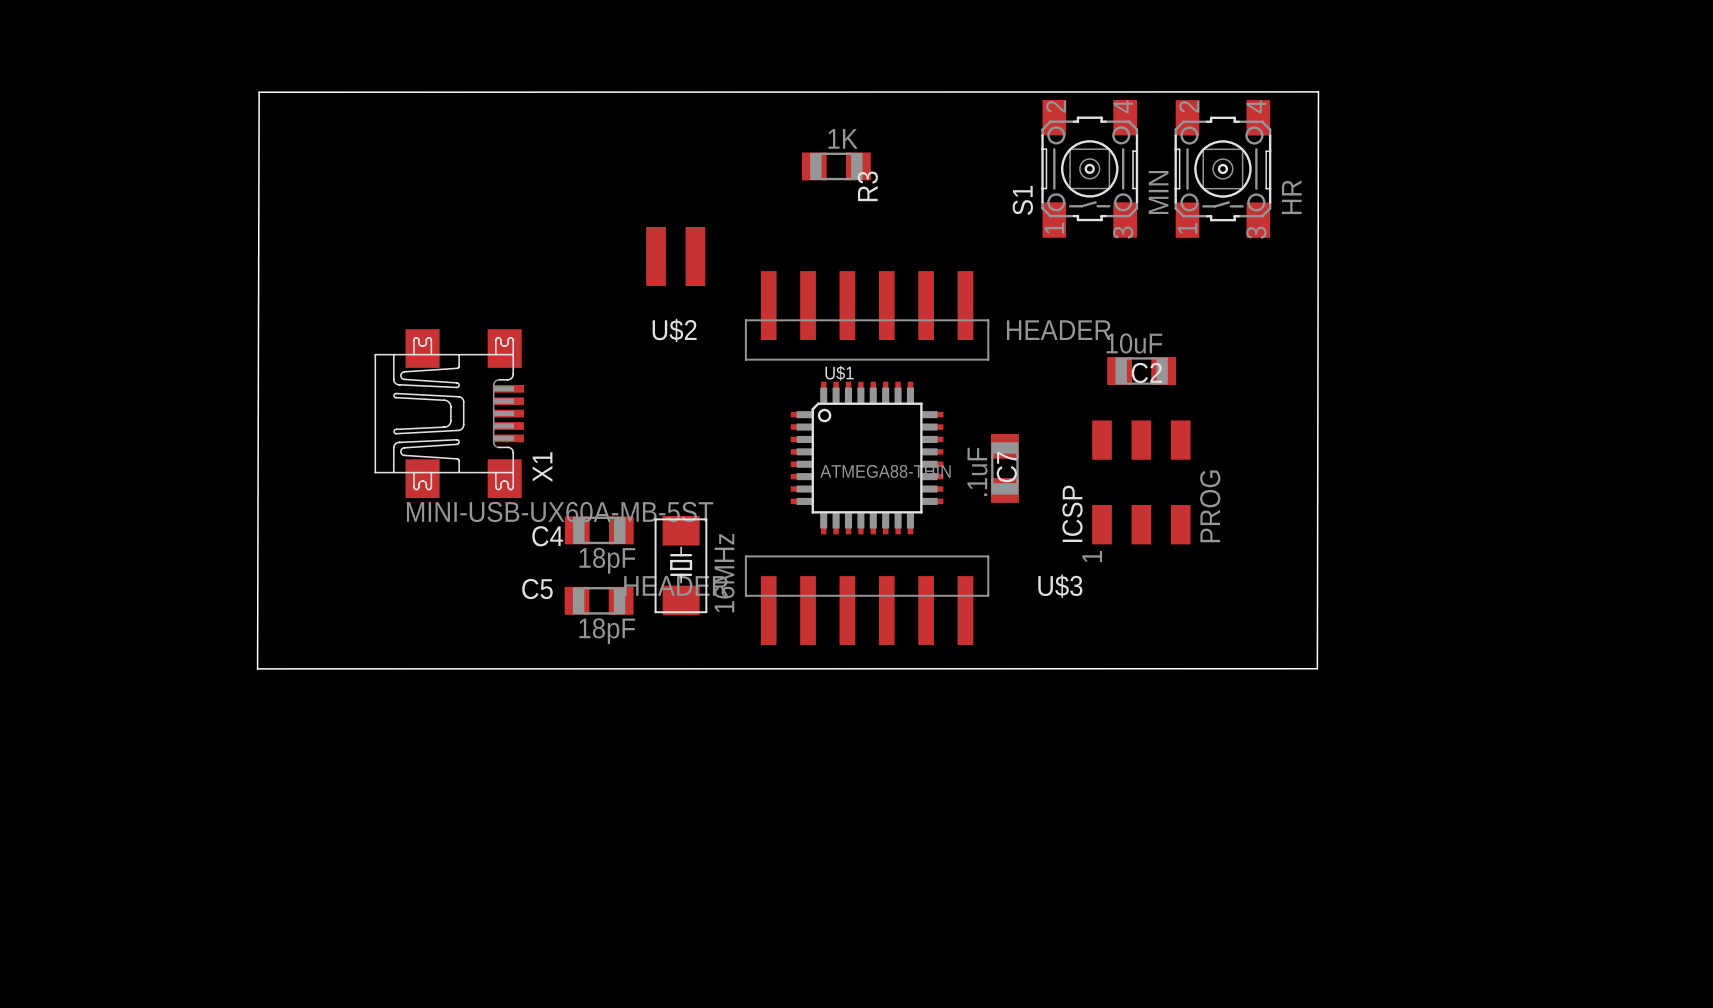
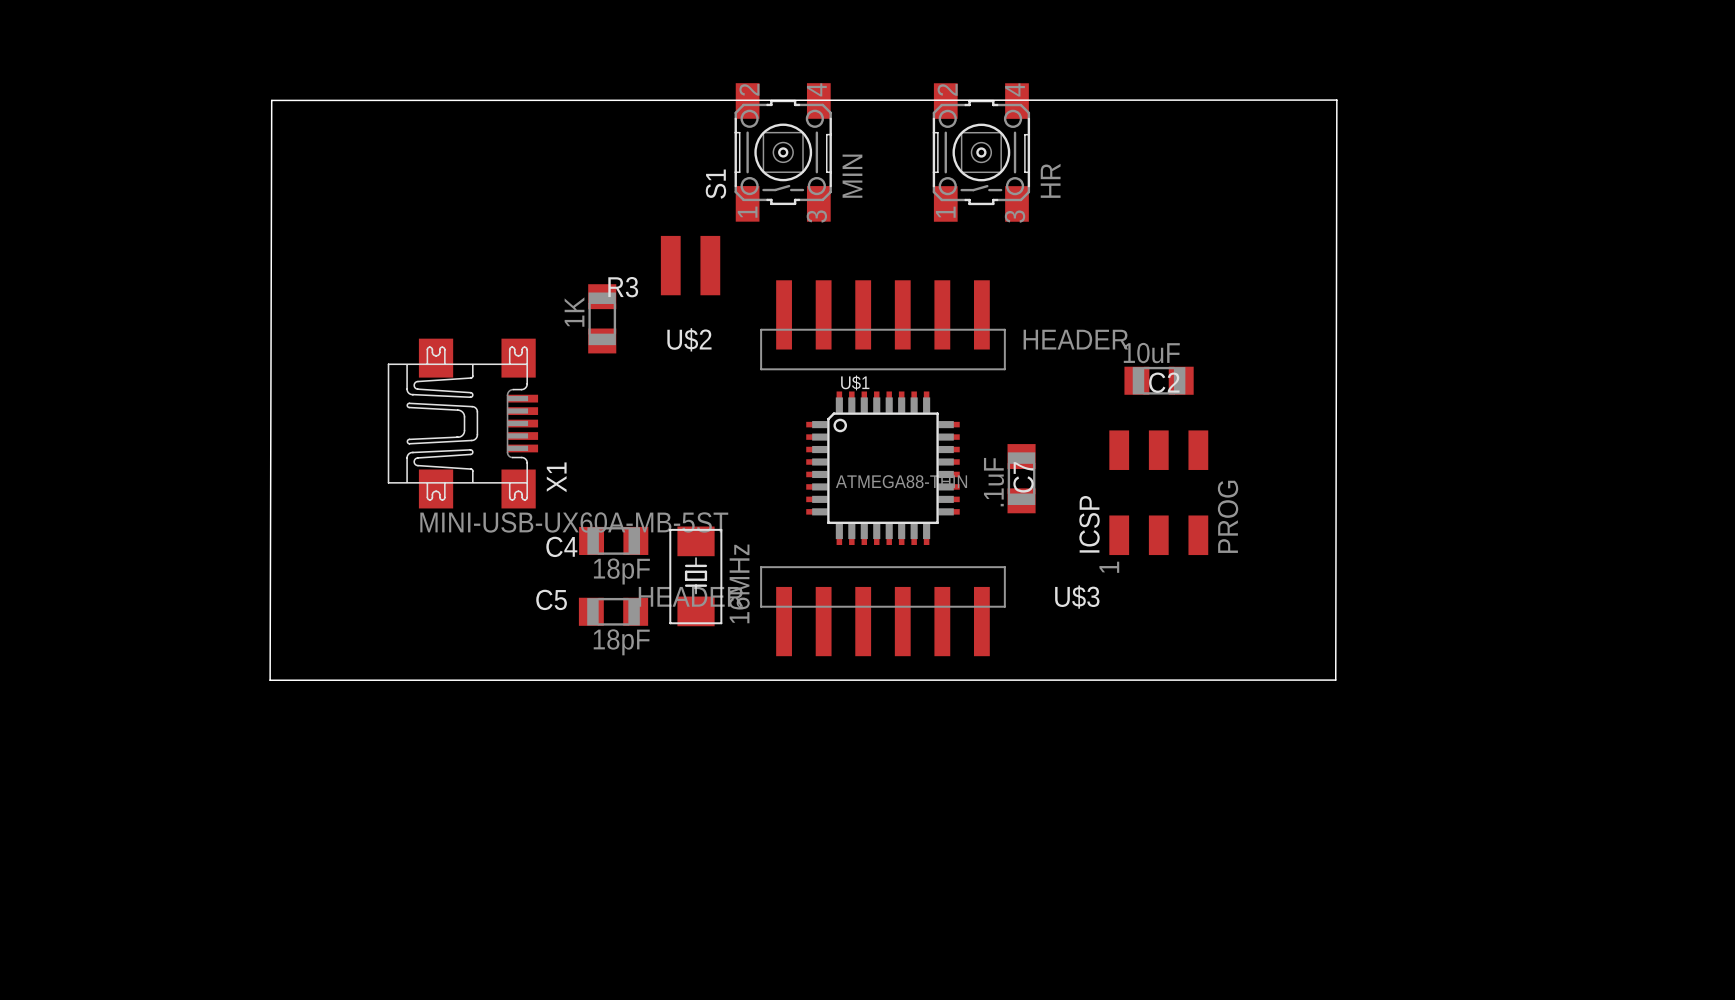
R3 value position: 1K (843, 138) -> 1K (574, 312)
R3 rotation: 0° (836, 166) -> 90° clockwise (602, 318)
R3 position: (836, 166) -> (602, 318)
S1 position: (1089, 168) -> (783, 152)
part position: (1222, 168) -> (981, 152)
R3 name position: R3 (867, 186) -> R3 (623, 287)

